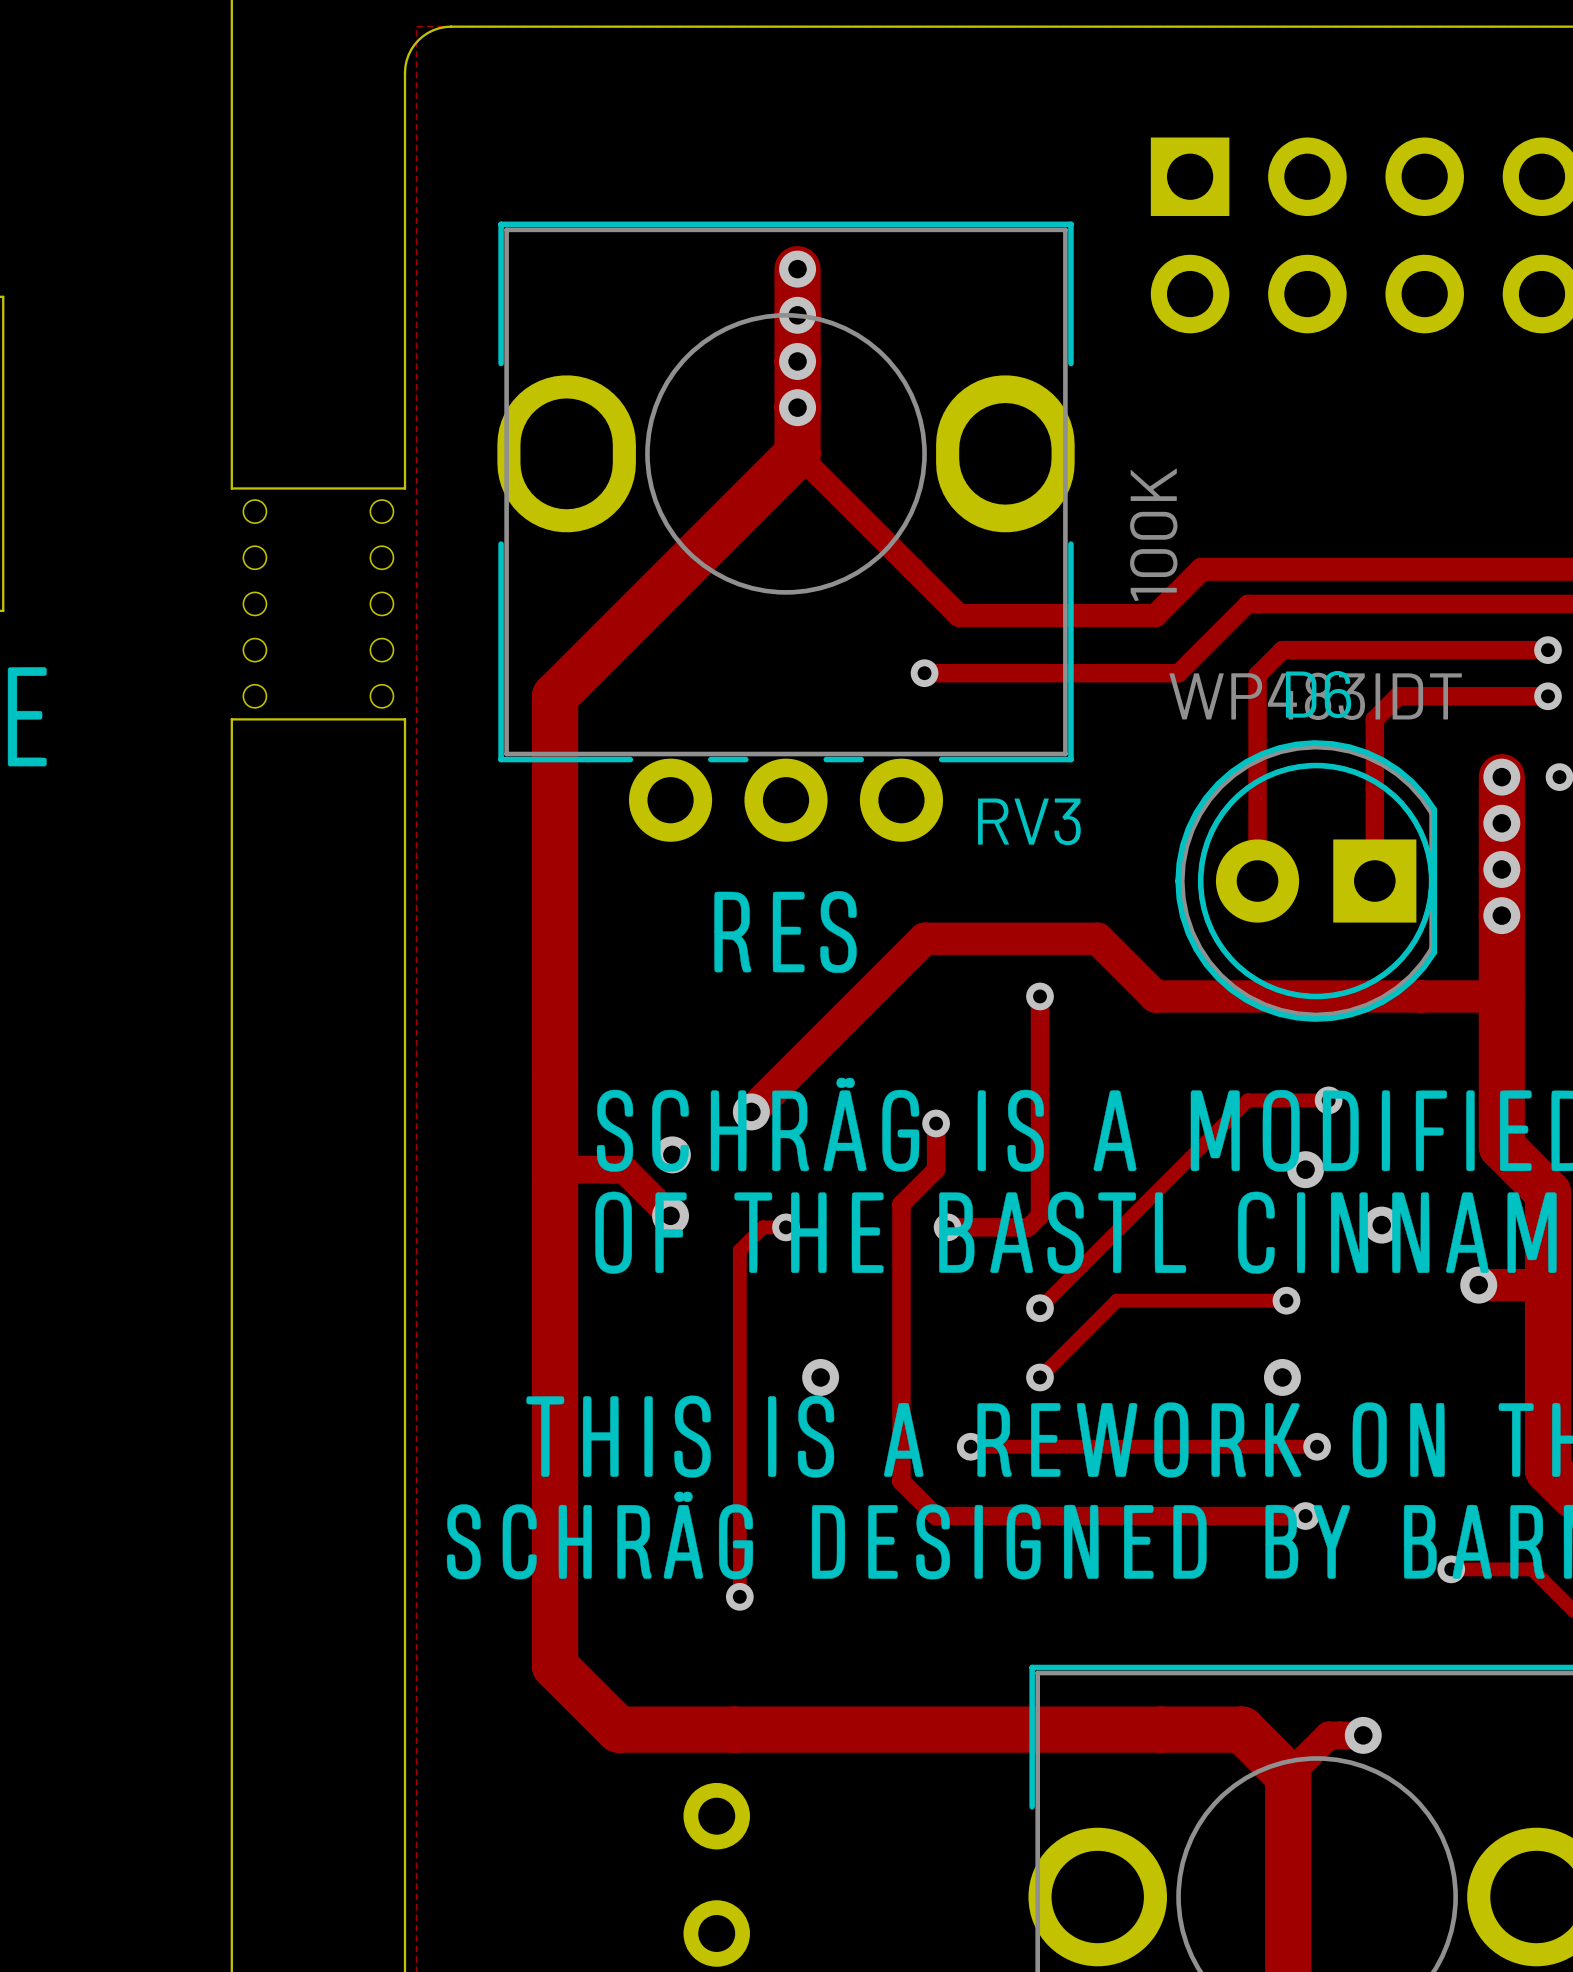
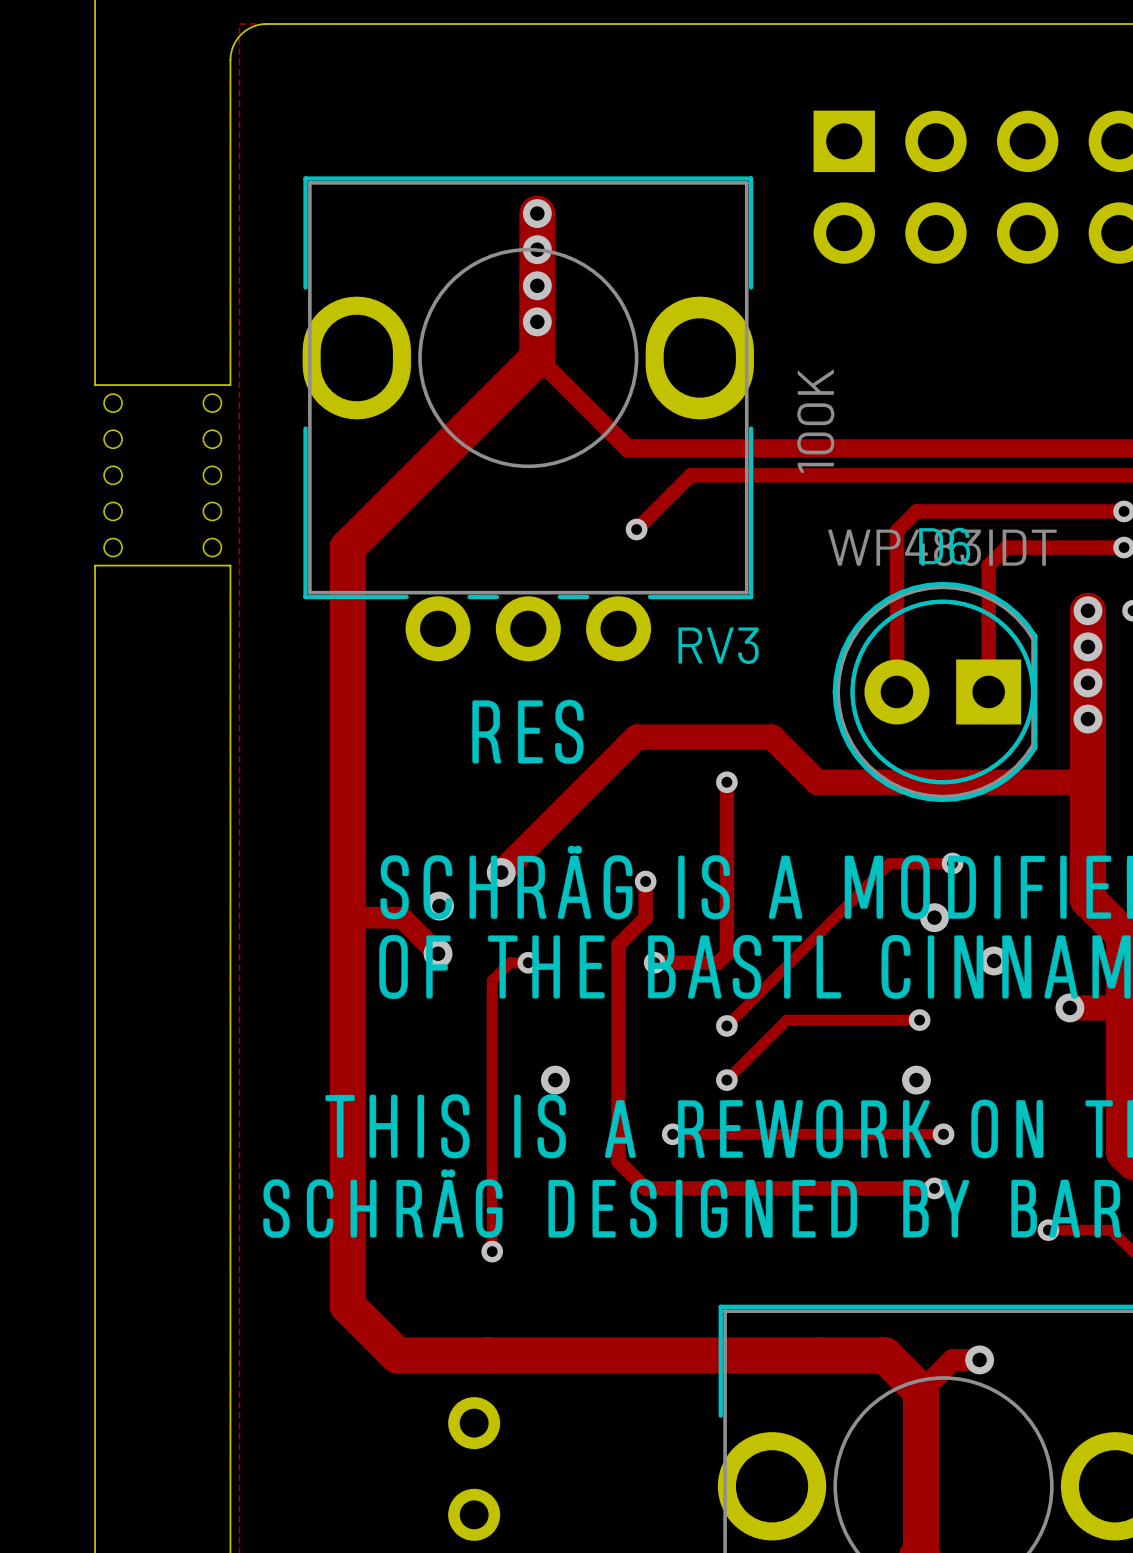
track: (913, 569) (959, 615) (1155, 615) (1201, 569) -> (627, 448) (853, 448)
track: (1247, 603) (1178, 673) (924, 673) -> (889, 475) (690, 475) (636, 529)

